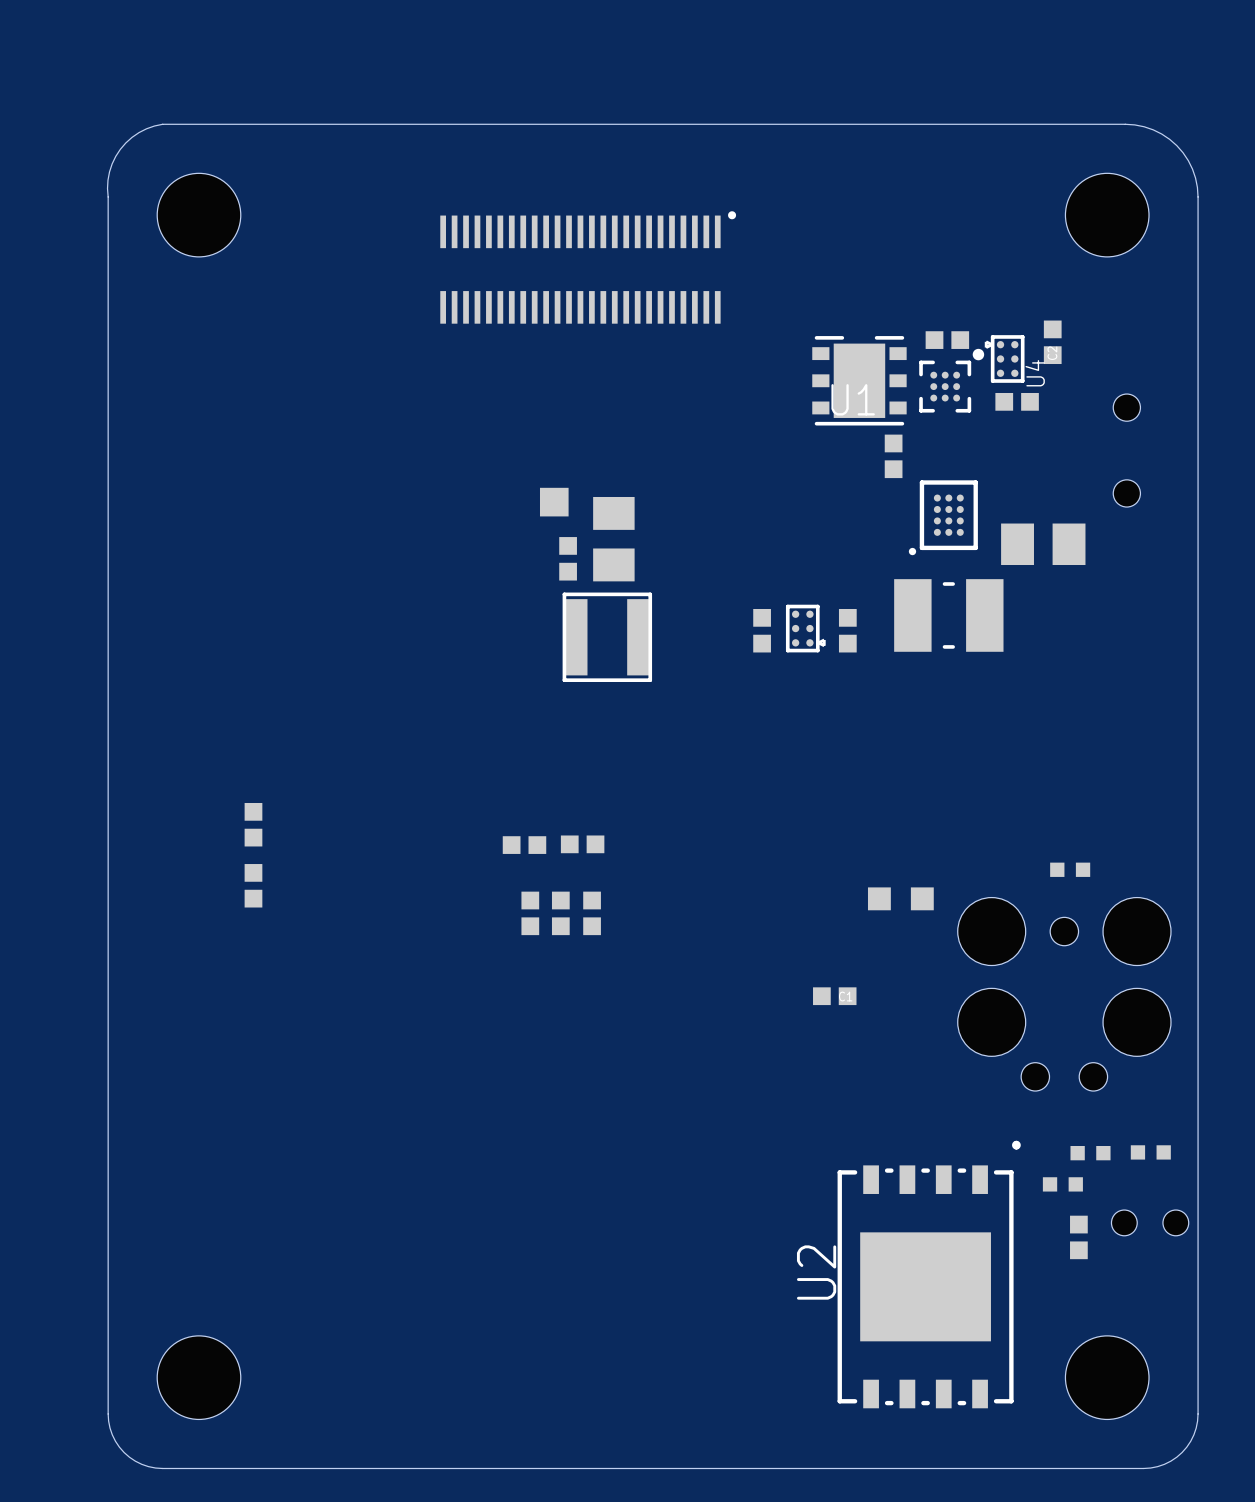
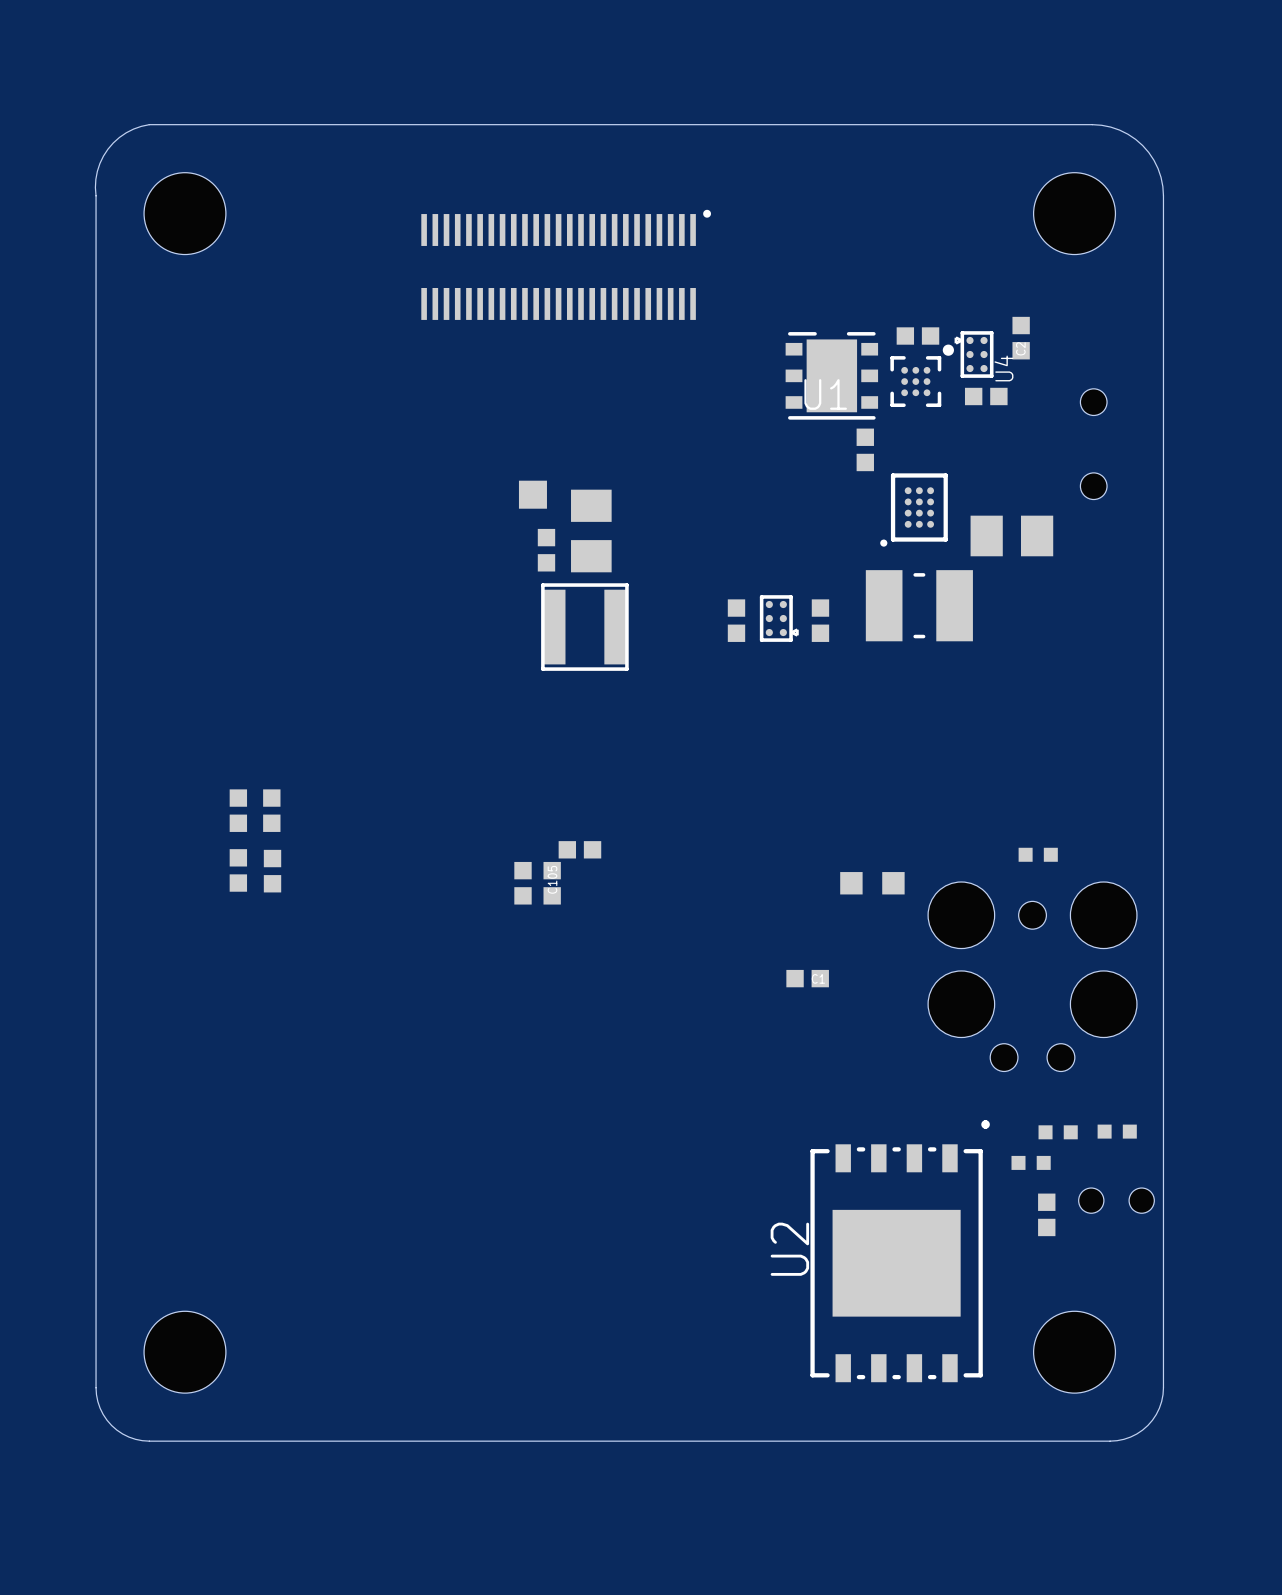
part: none -> (271, 810)
part: (582, 844) -> none
part: (524, 845) -> none
part: none -> (579, 849)
part: none -> (272, 871)
part: none -> (523, 883)
part: none -> (552, 883)
part: (530, 913) -> none
part: (560, 913) -> none
part: (592, 913) -> none

